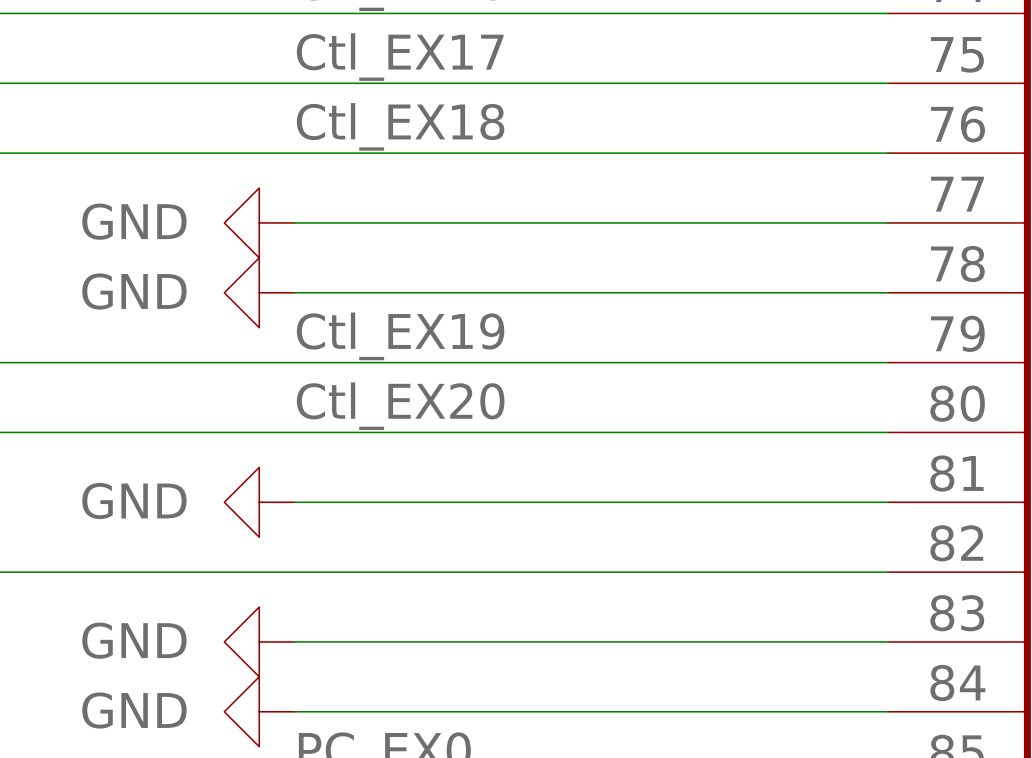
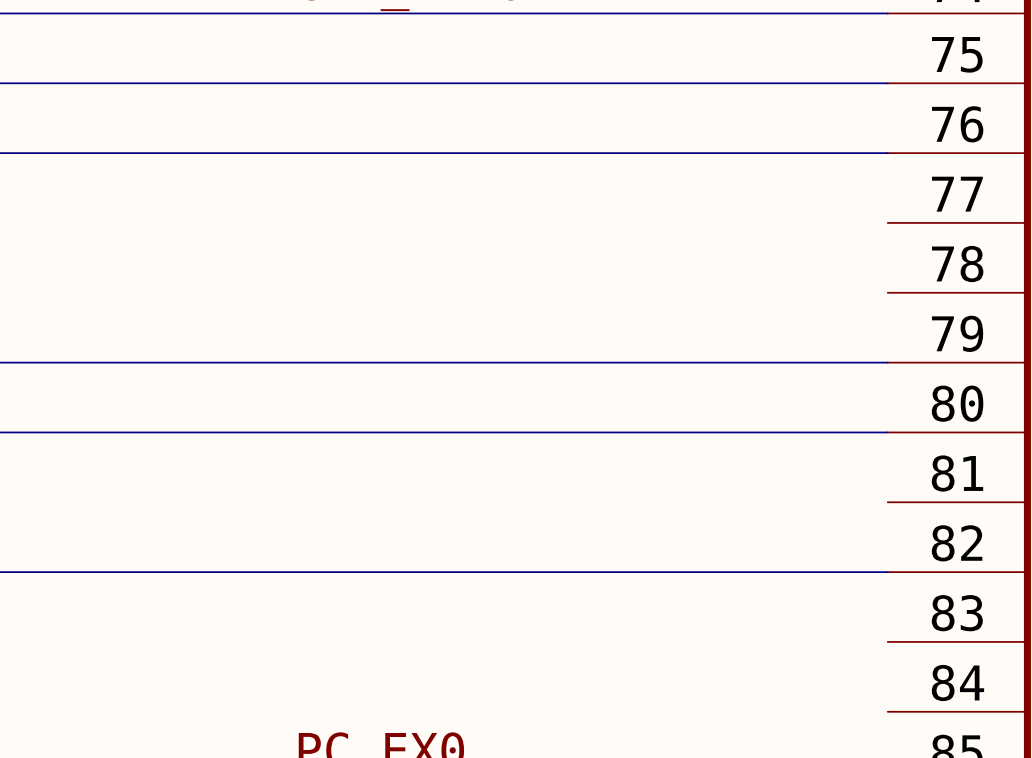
label: Ctl_EX17 (400, 57) -> none
label: Ctl_EX18 (400, 126) -> none
power symbol: GND (259, 222) -> none
wire: (294, 222) (887, 222) -> none
power symbol: GND (259, 292) -> none
wire: (294, 292) (887, 292) -> none
label: Ctl_EX19 (400, 336) -> none
label: Ctl_EX20 (400, 406) -> none
power symbol: GND (259, 502) -> none
wire: (294, 502) (887, 502) -> none
power symbol: GND (259, 641) -> none
wire: (294, 641) (887, 641) -> none
power symbol: GND (259, 711) -> none
wire: (294, 711) (887, 711) -> none

